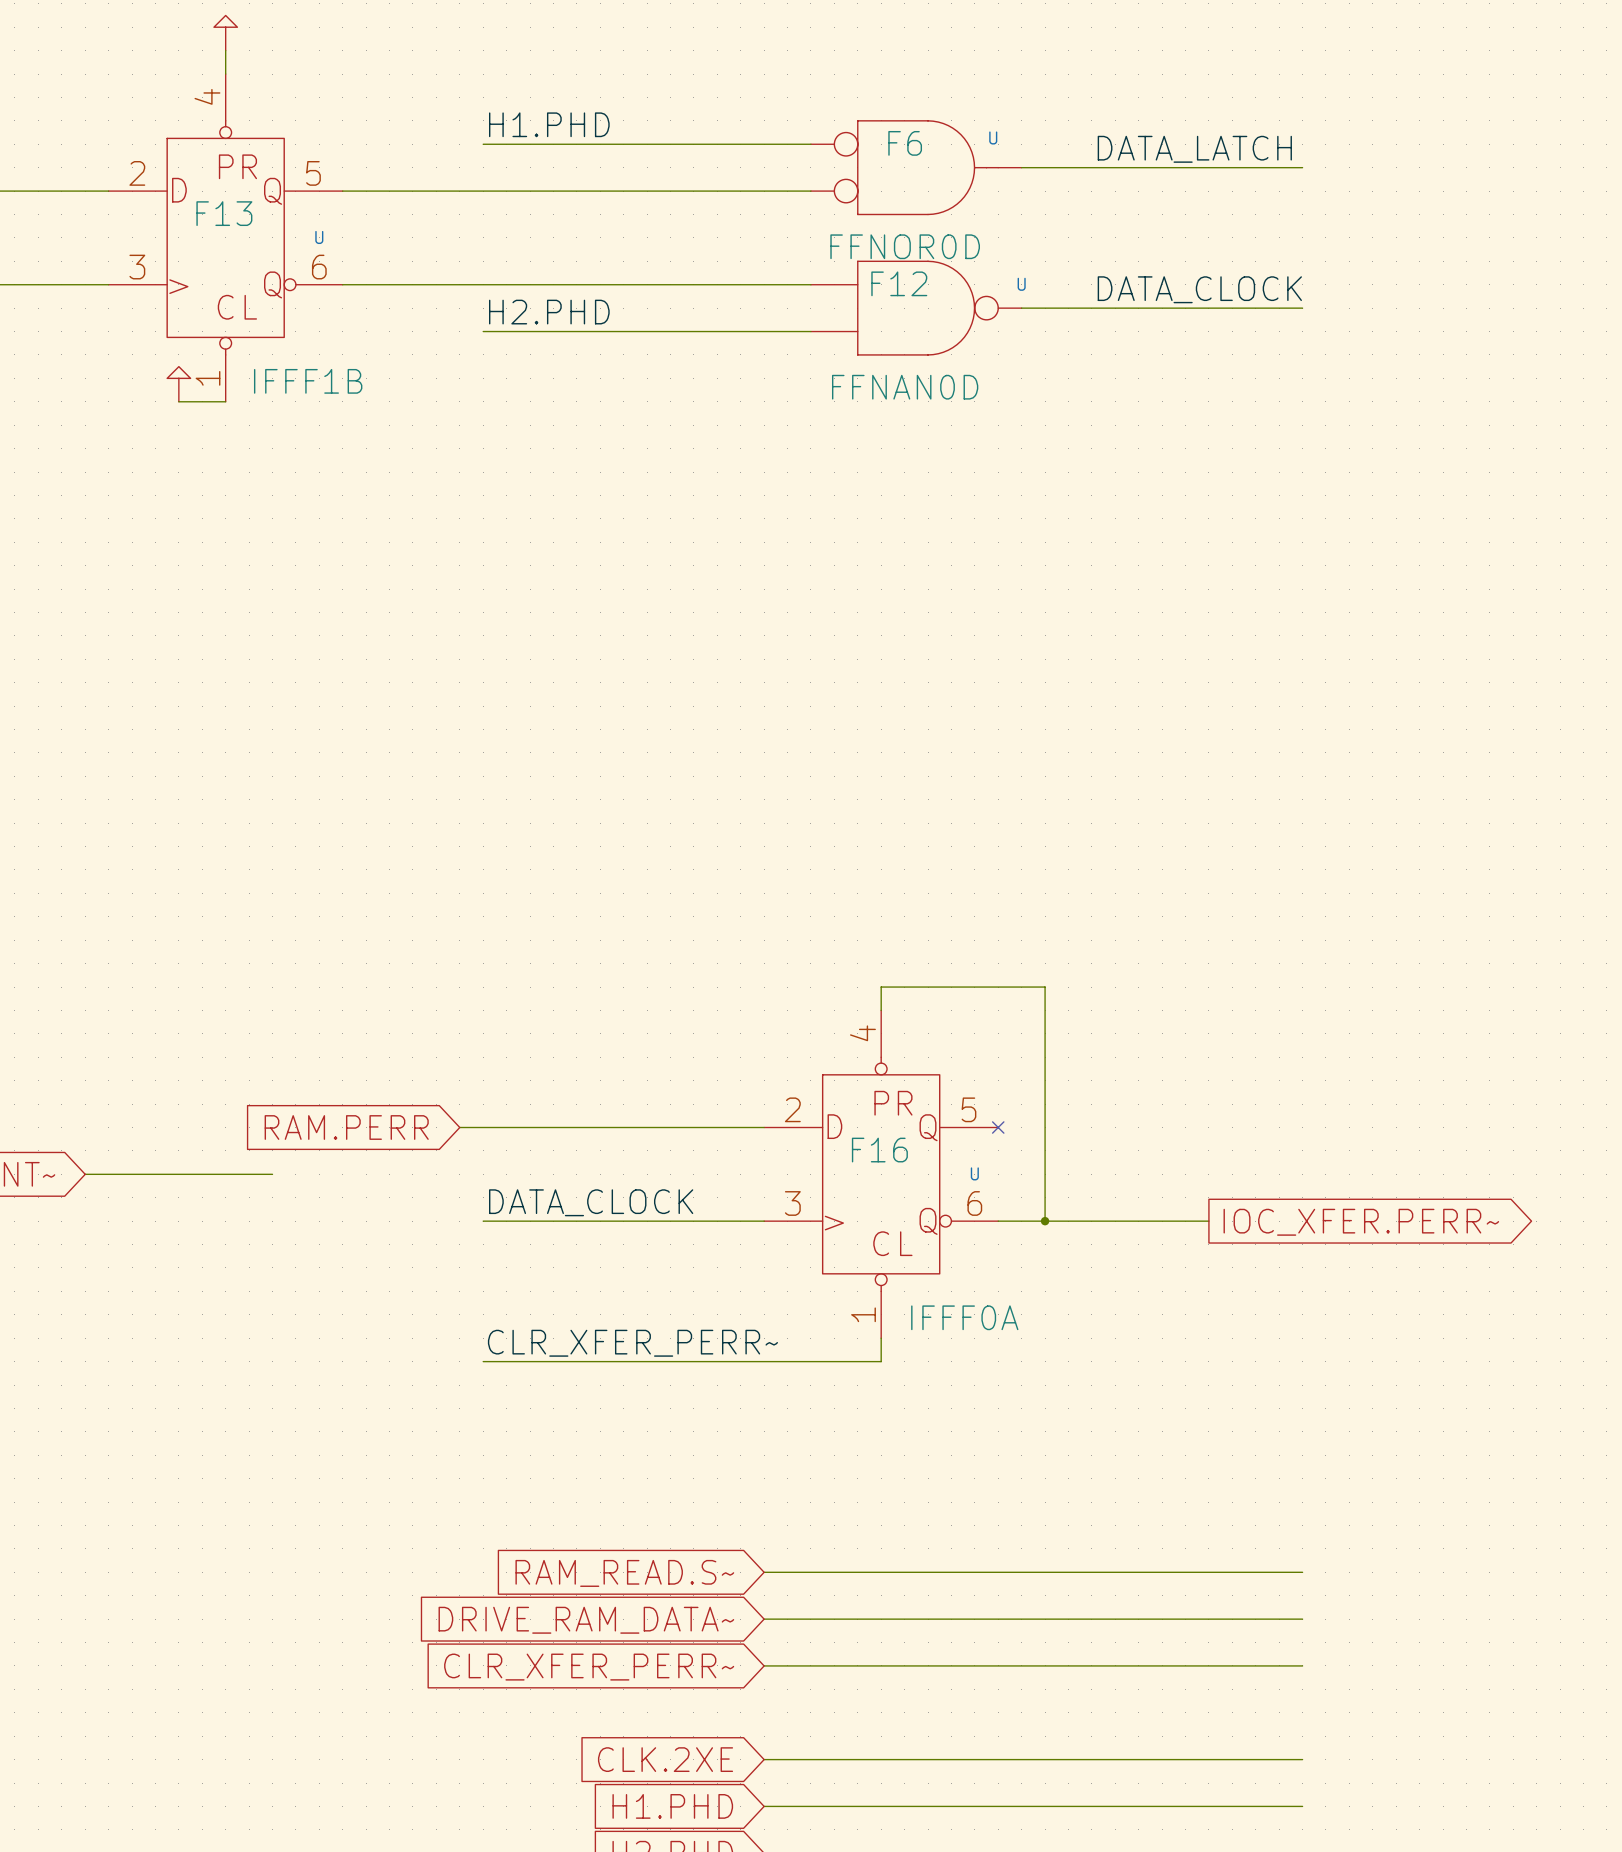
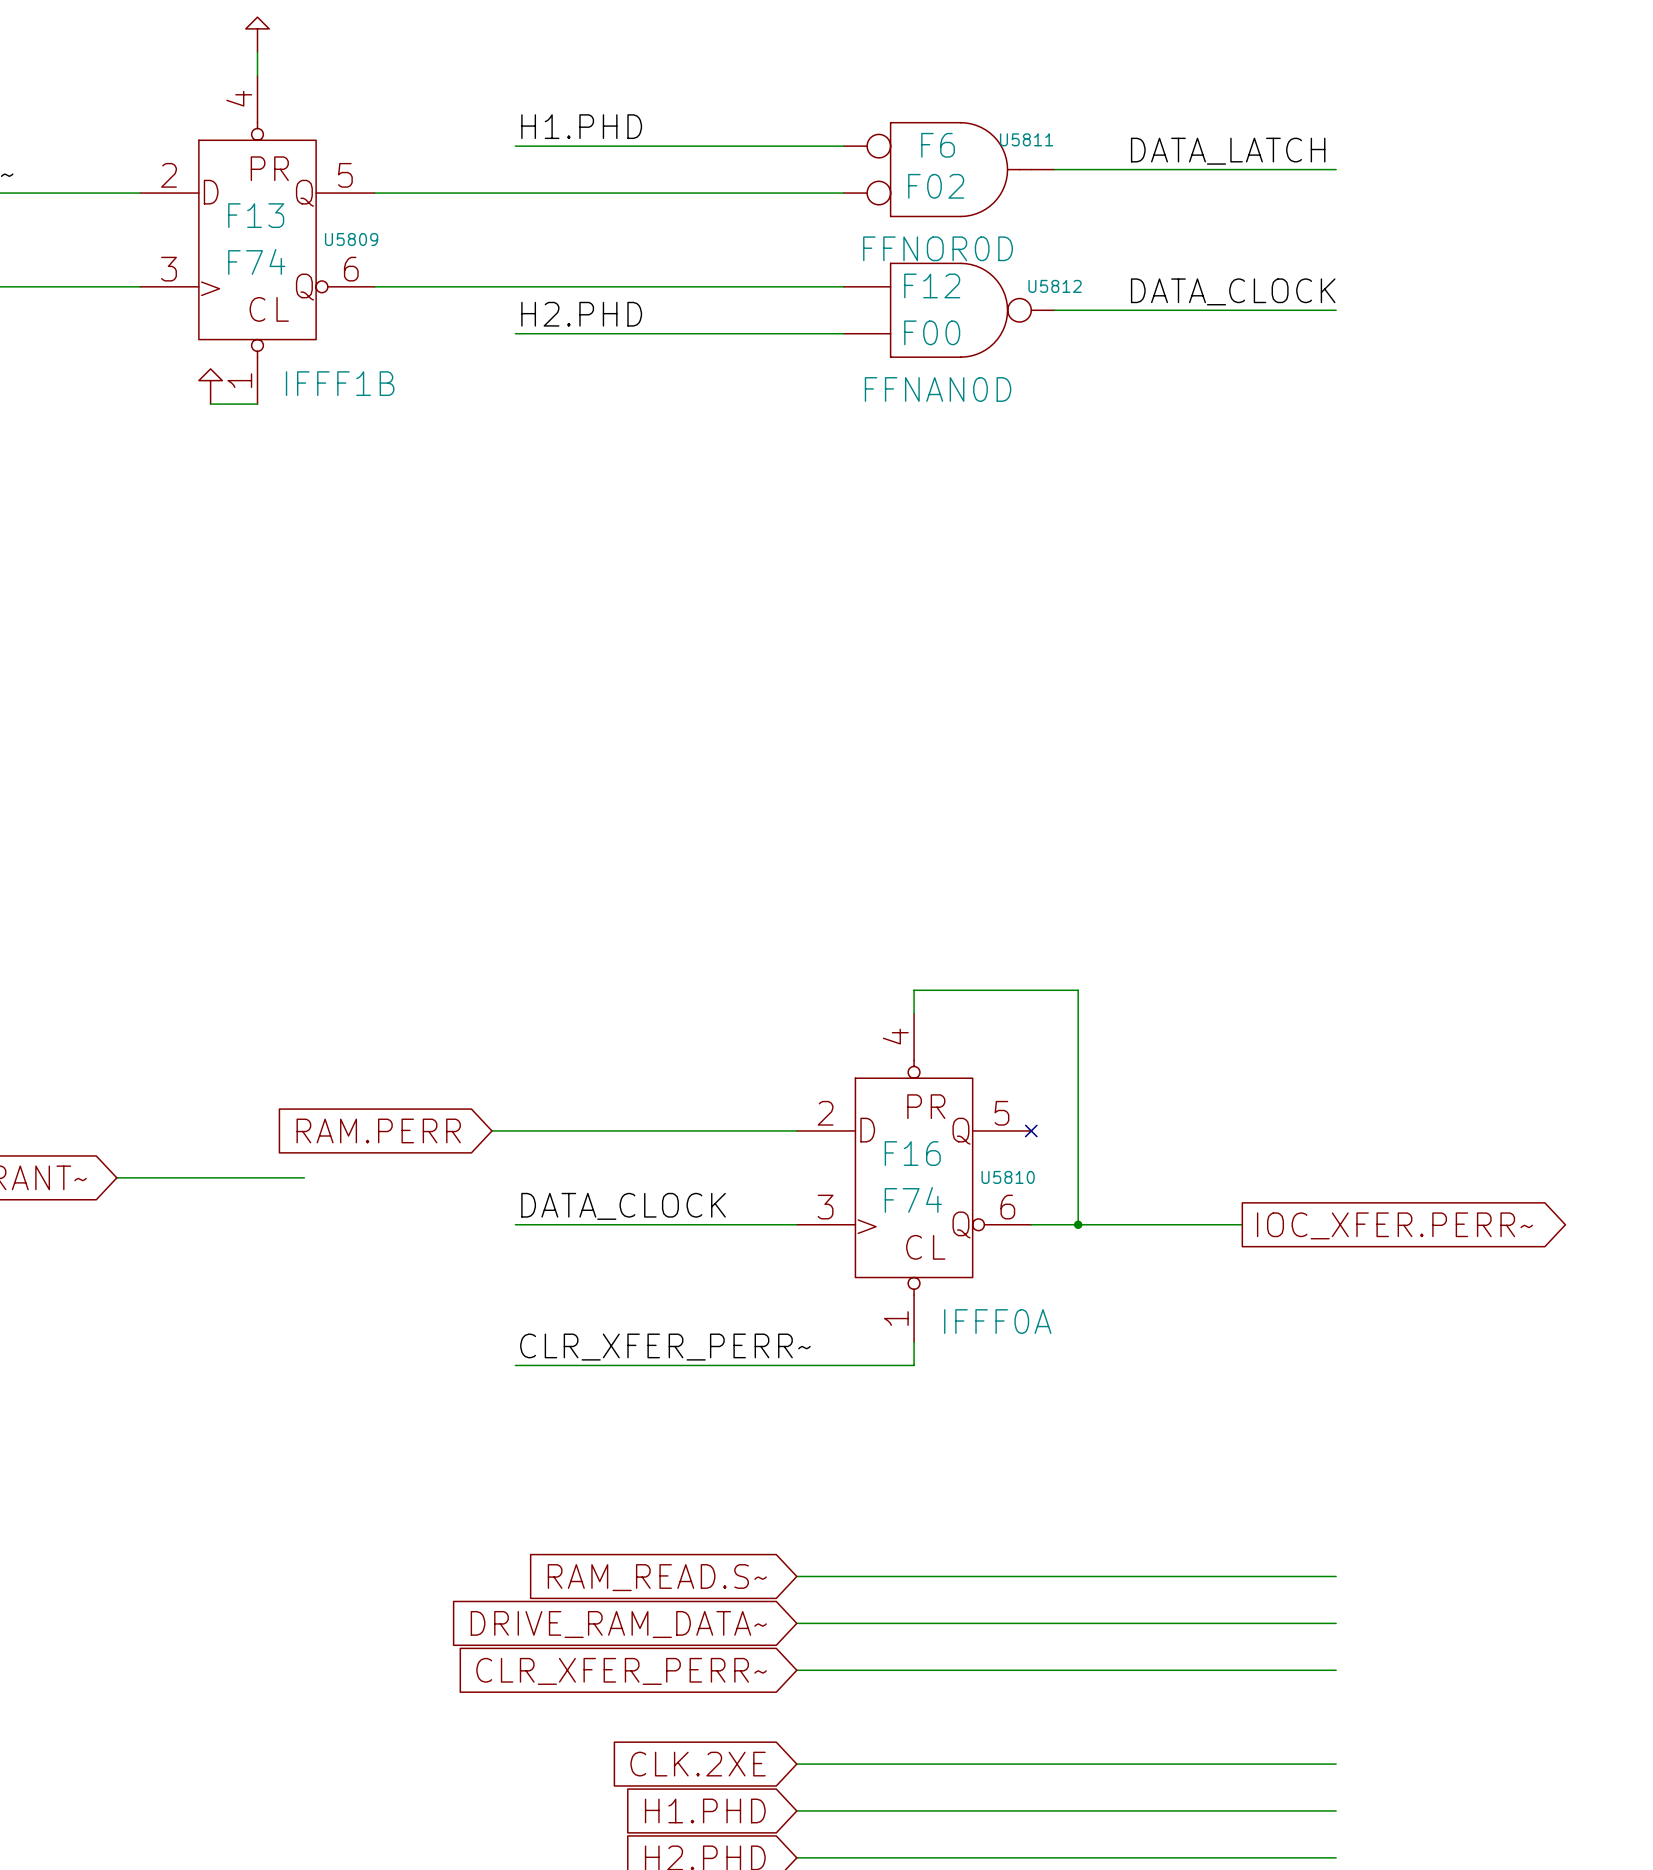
U name: U (993, 137) -> U5811 (1026, 139)
U value: none -> F02 (936, 186)
U name: U (319, 237) -> U5809 (351, 239)
U value: none -> F74 (256, 261)
U name: U (1021, 284) -> U5812 (1055, 286)
U value: none -> F00 (932, 332)
U name: U (974, 1173) -> U5810 (1008, 1177)
U value: none -> F74 (913, 1199)

